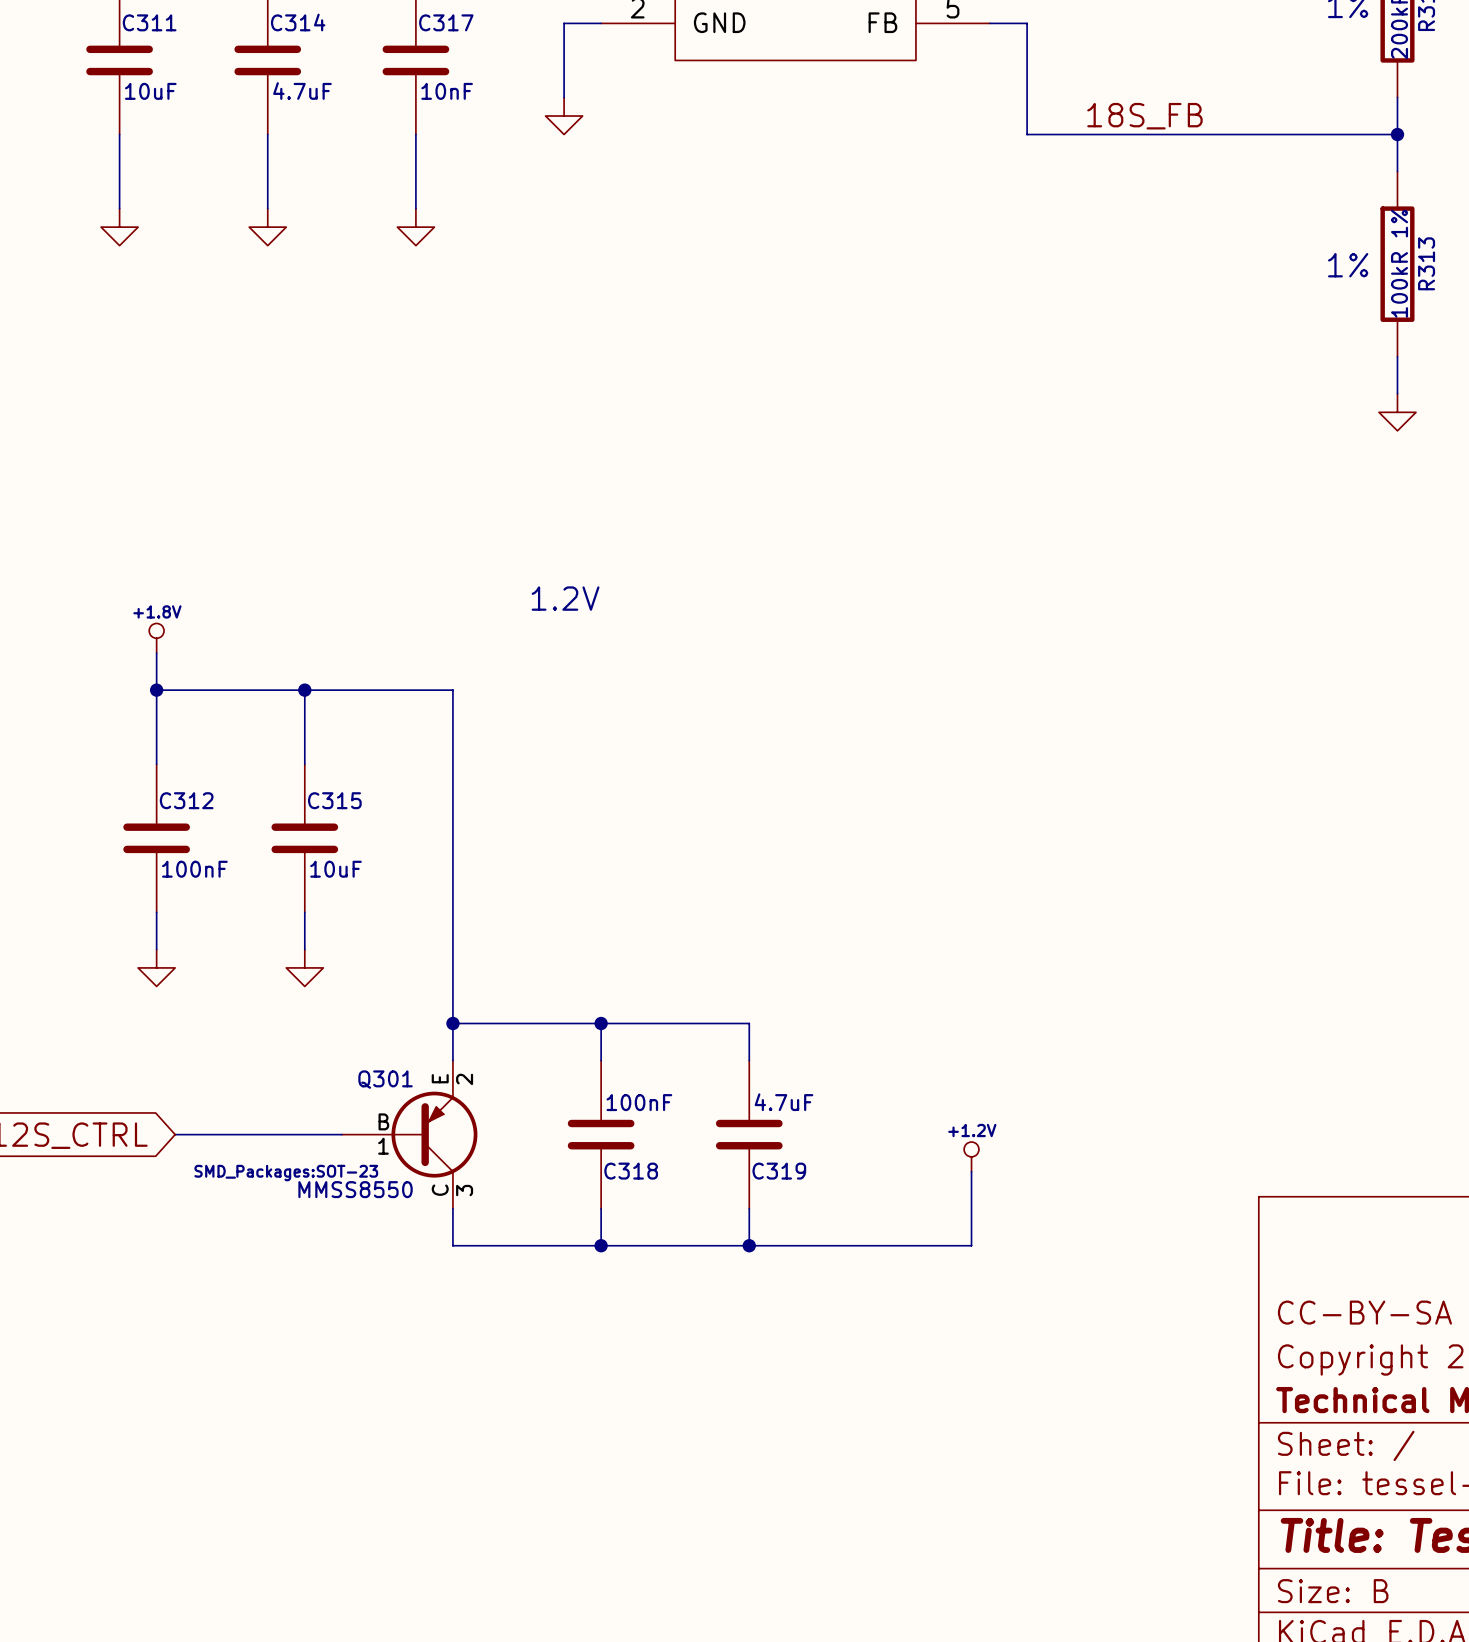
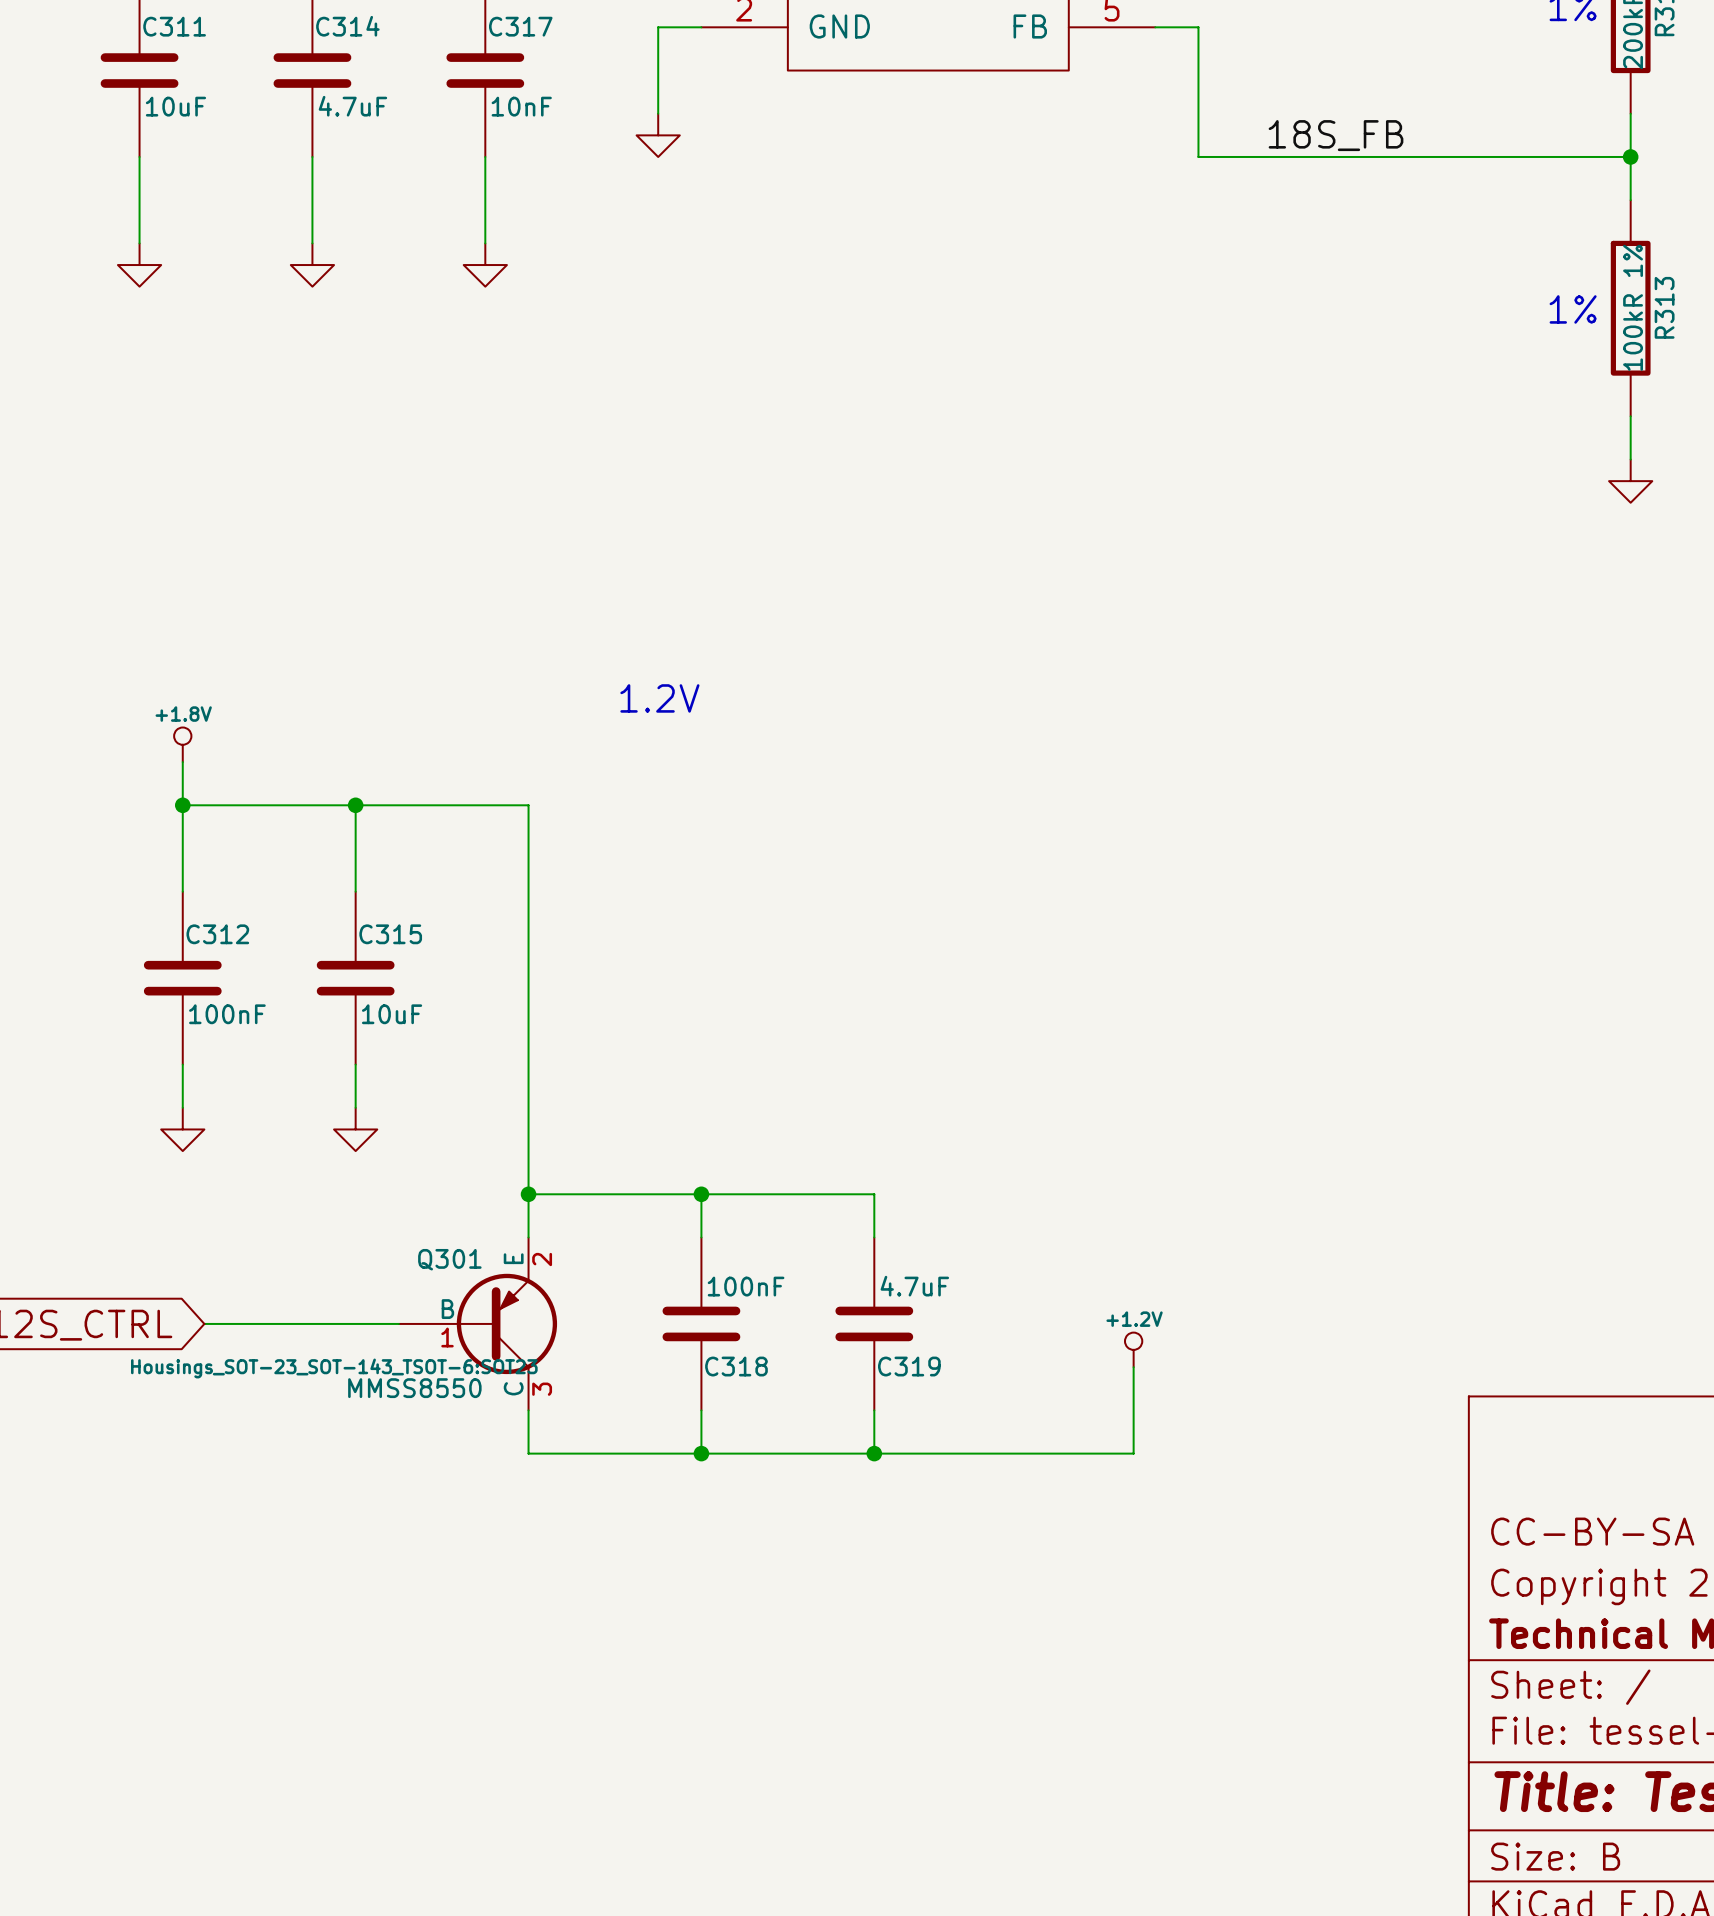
Q301 text: SMD_Packages:SOT-23 (286, 1173) -> Housings_SOT-23_SOT-143_TSOT-6:SOT23 (334, 1368)

